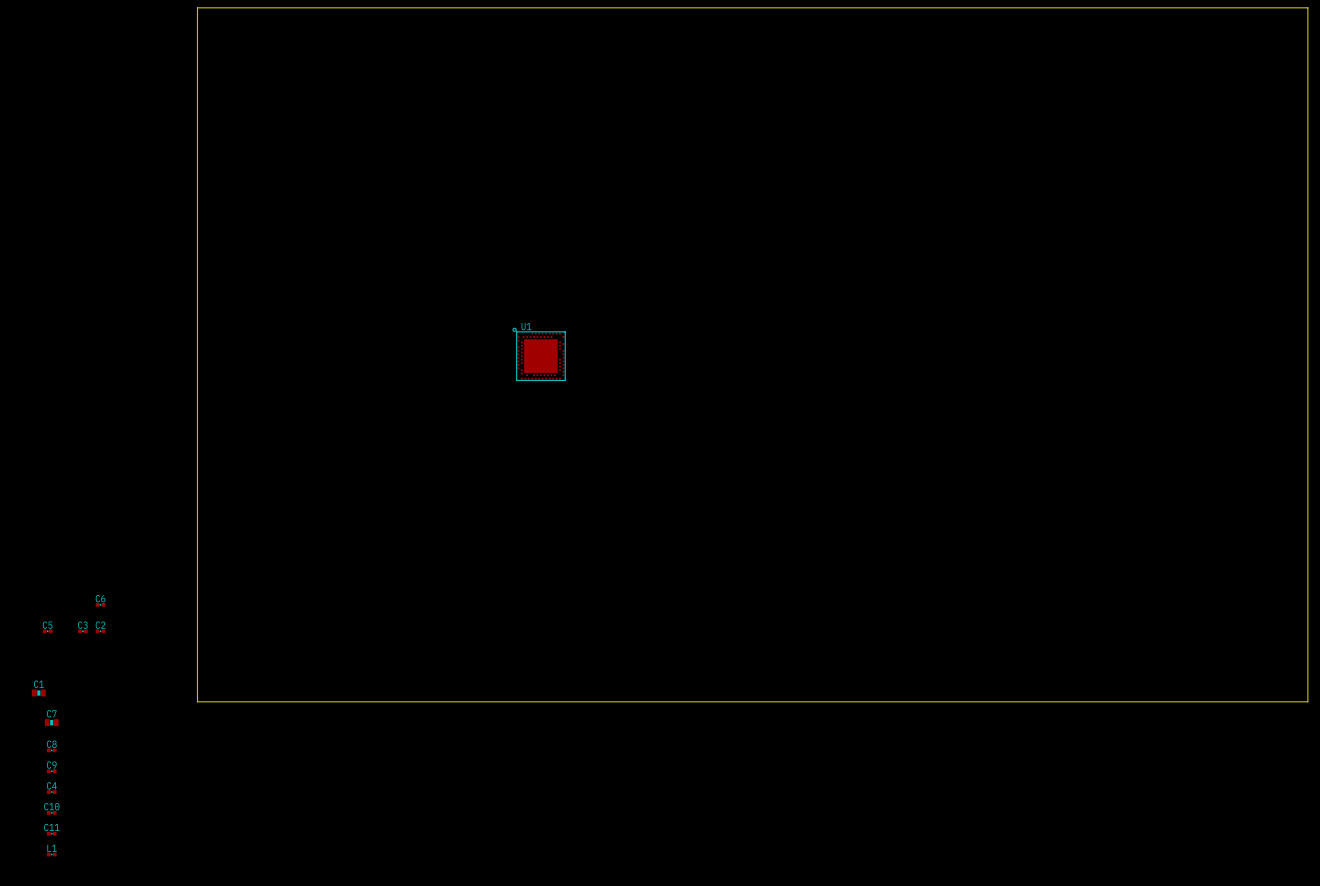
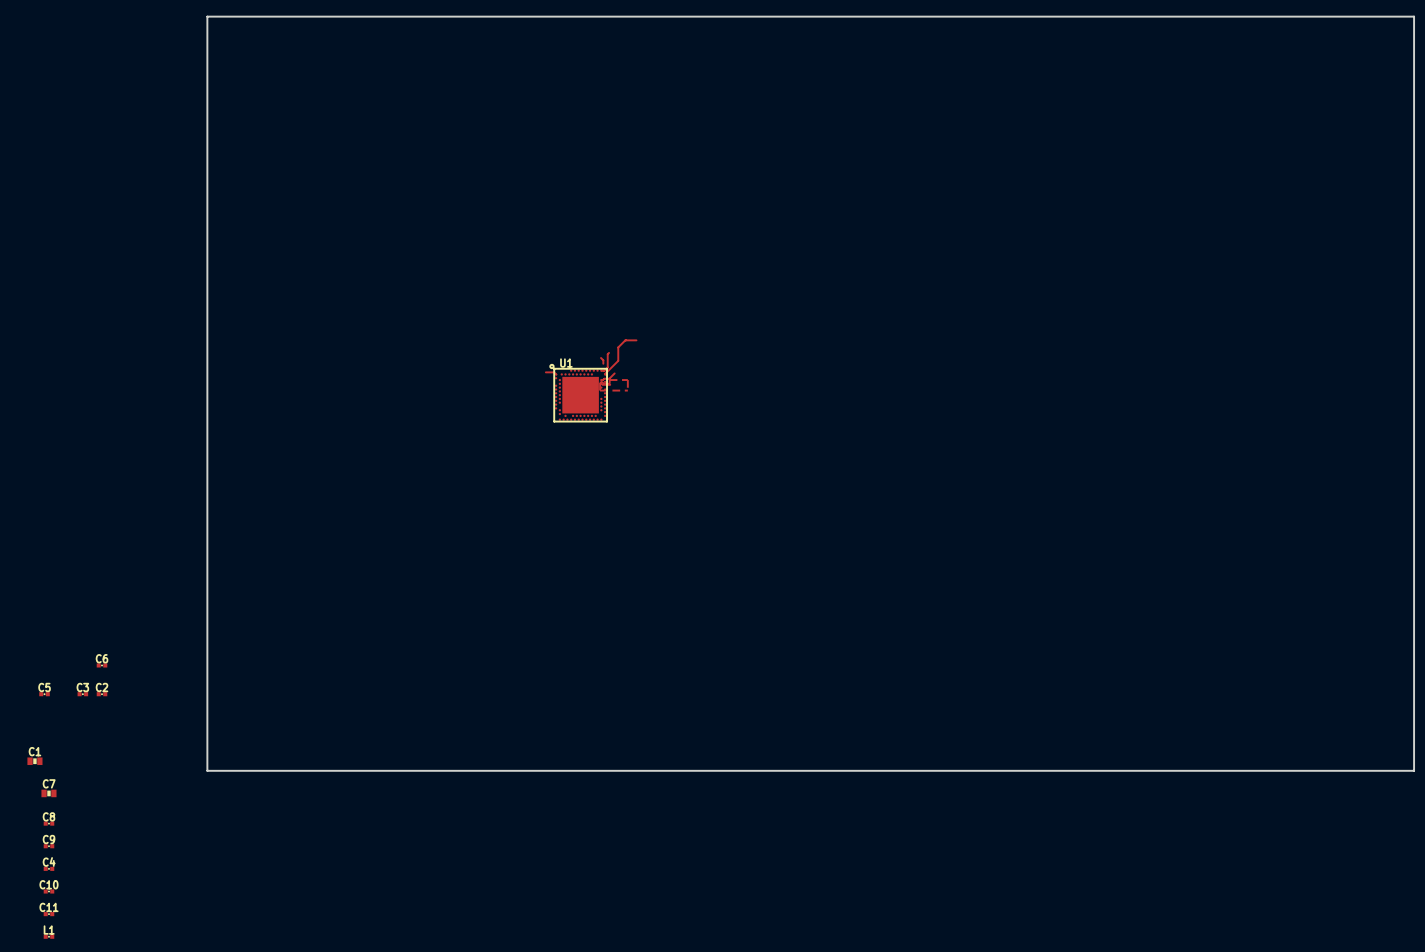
top track: none -> (636, 340) (625, 340) (618, 347) (618, 360) (605, 374)
top track: none -> (609, 352) (607, 367) (601, 370)
top track: none -> (601, 357) (603, 363)
top track: none -> (545, 372) (554, 372) (556, 374)
top track: none -> (614, 373) (609, 378) (601, 380)
top zone outline: none -> (609, 380) (609, 383) (600, 382) (600, 390) (627, 390) (627, 380) (609, 380)
top track: none -> (602, 384) (610, 384)

